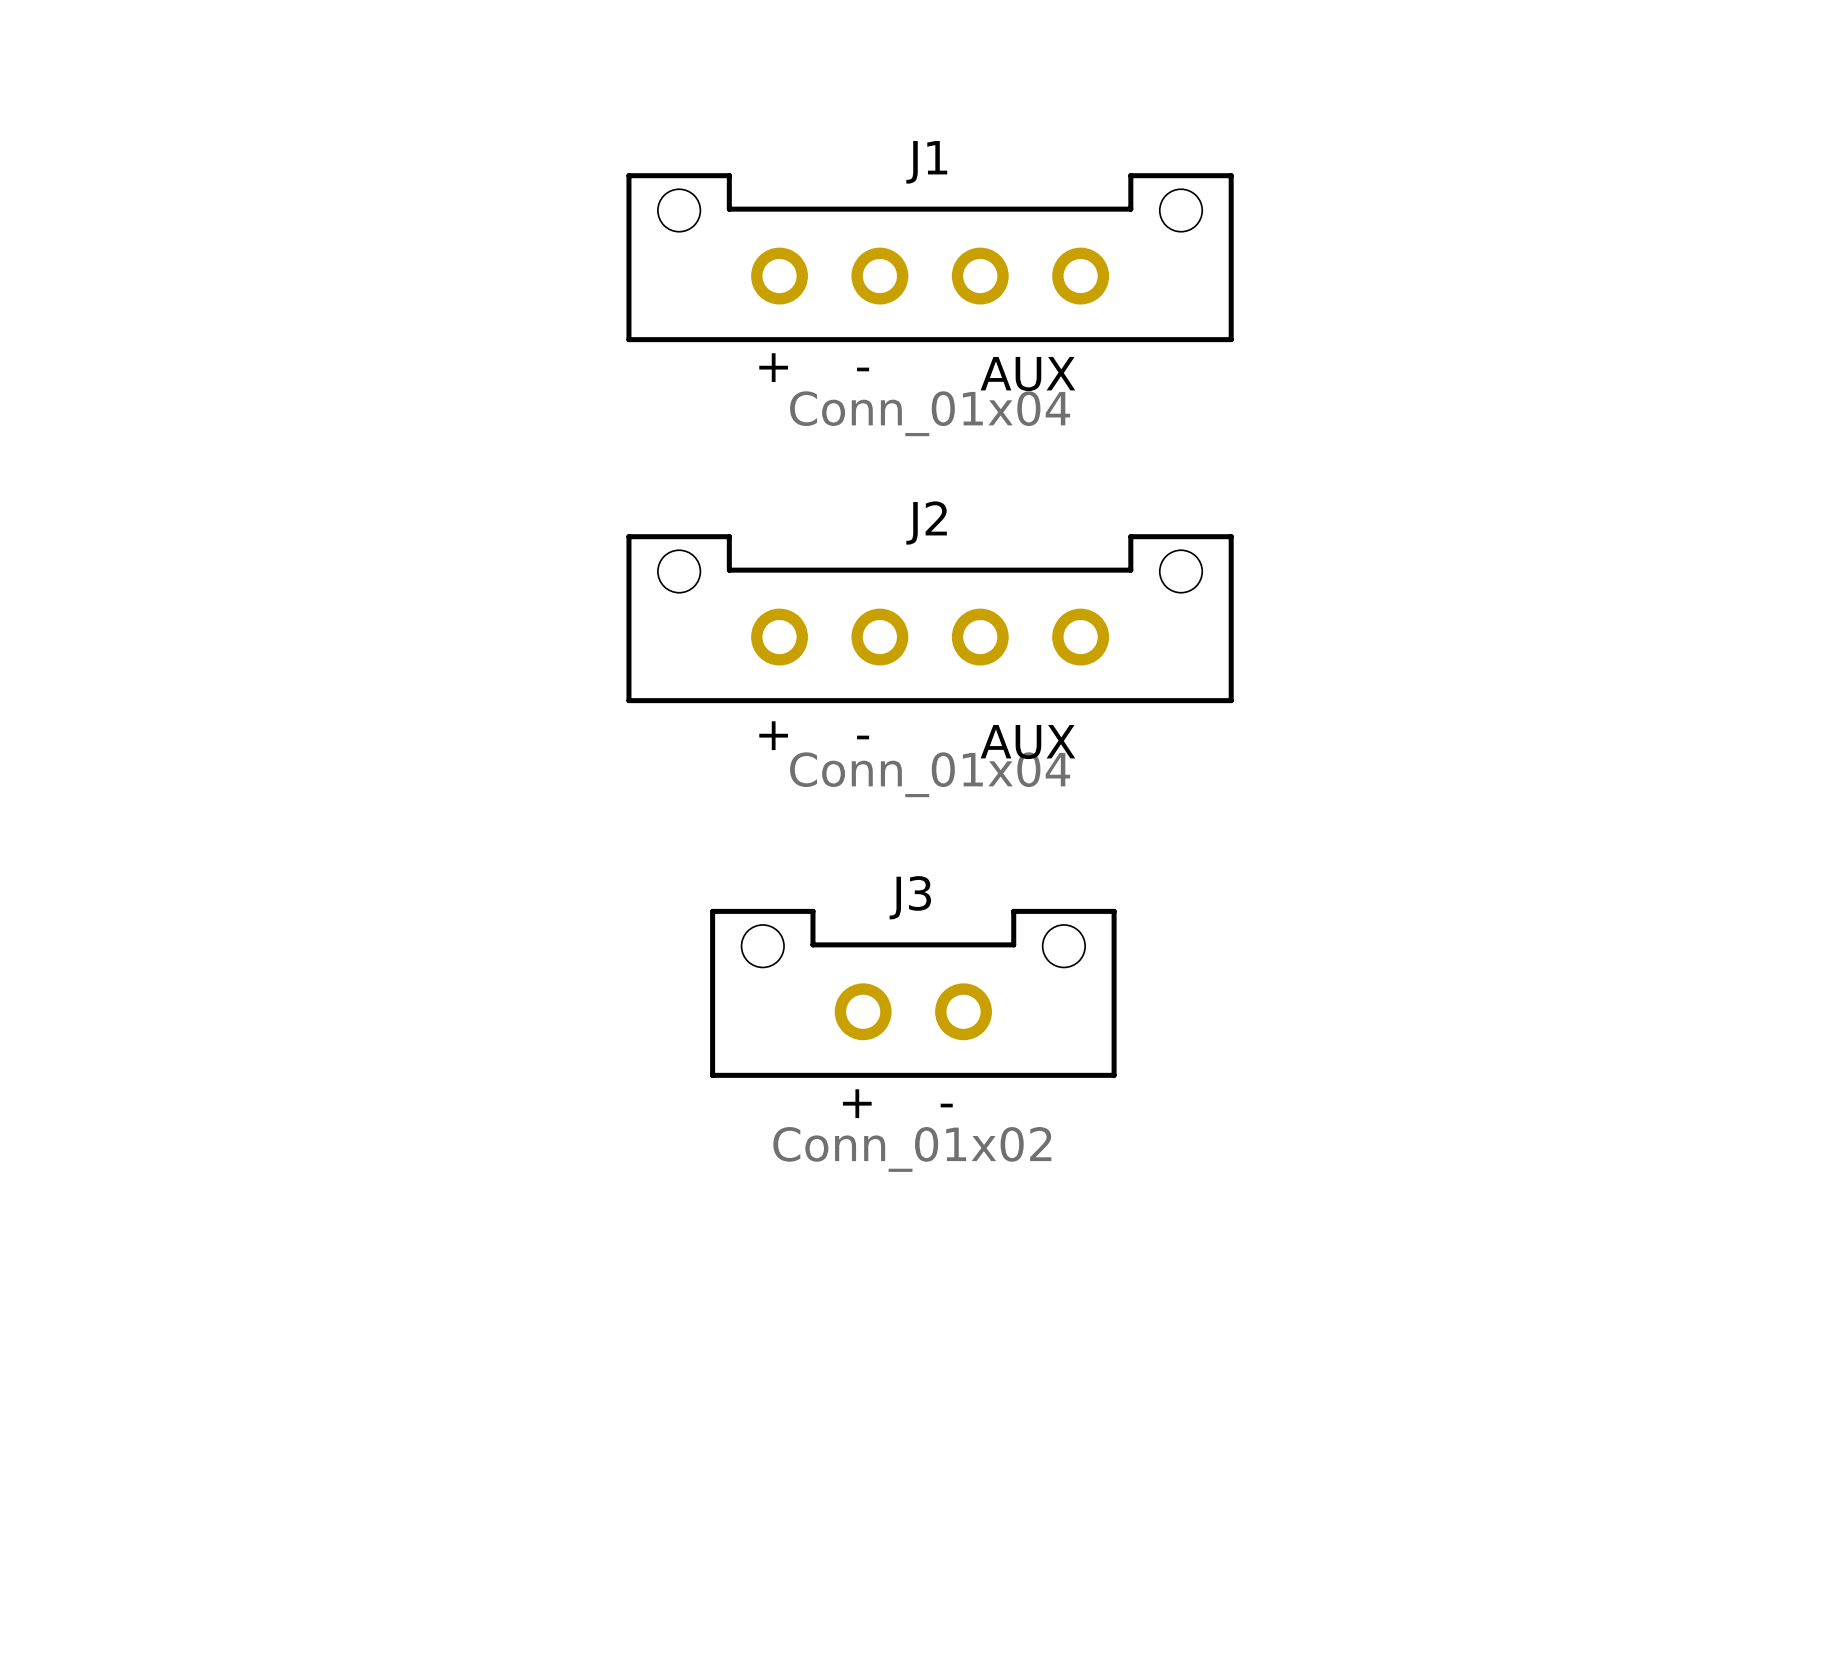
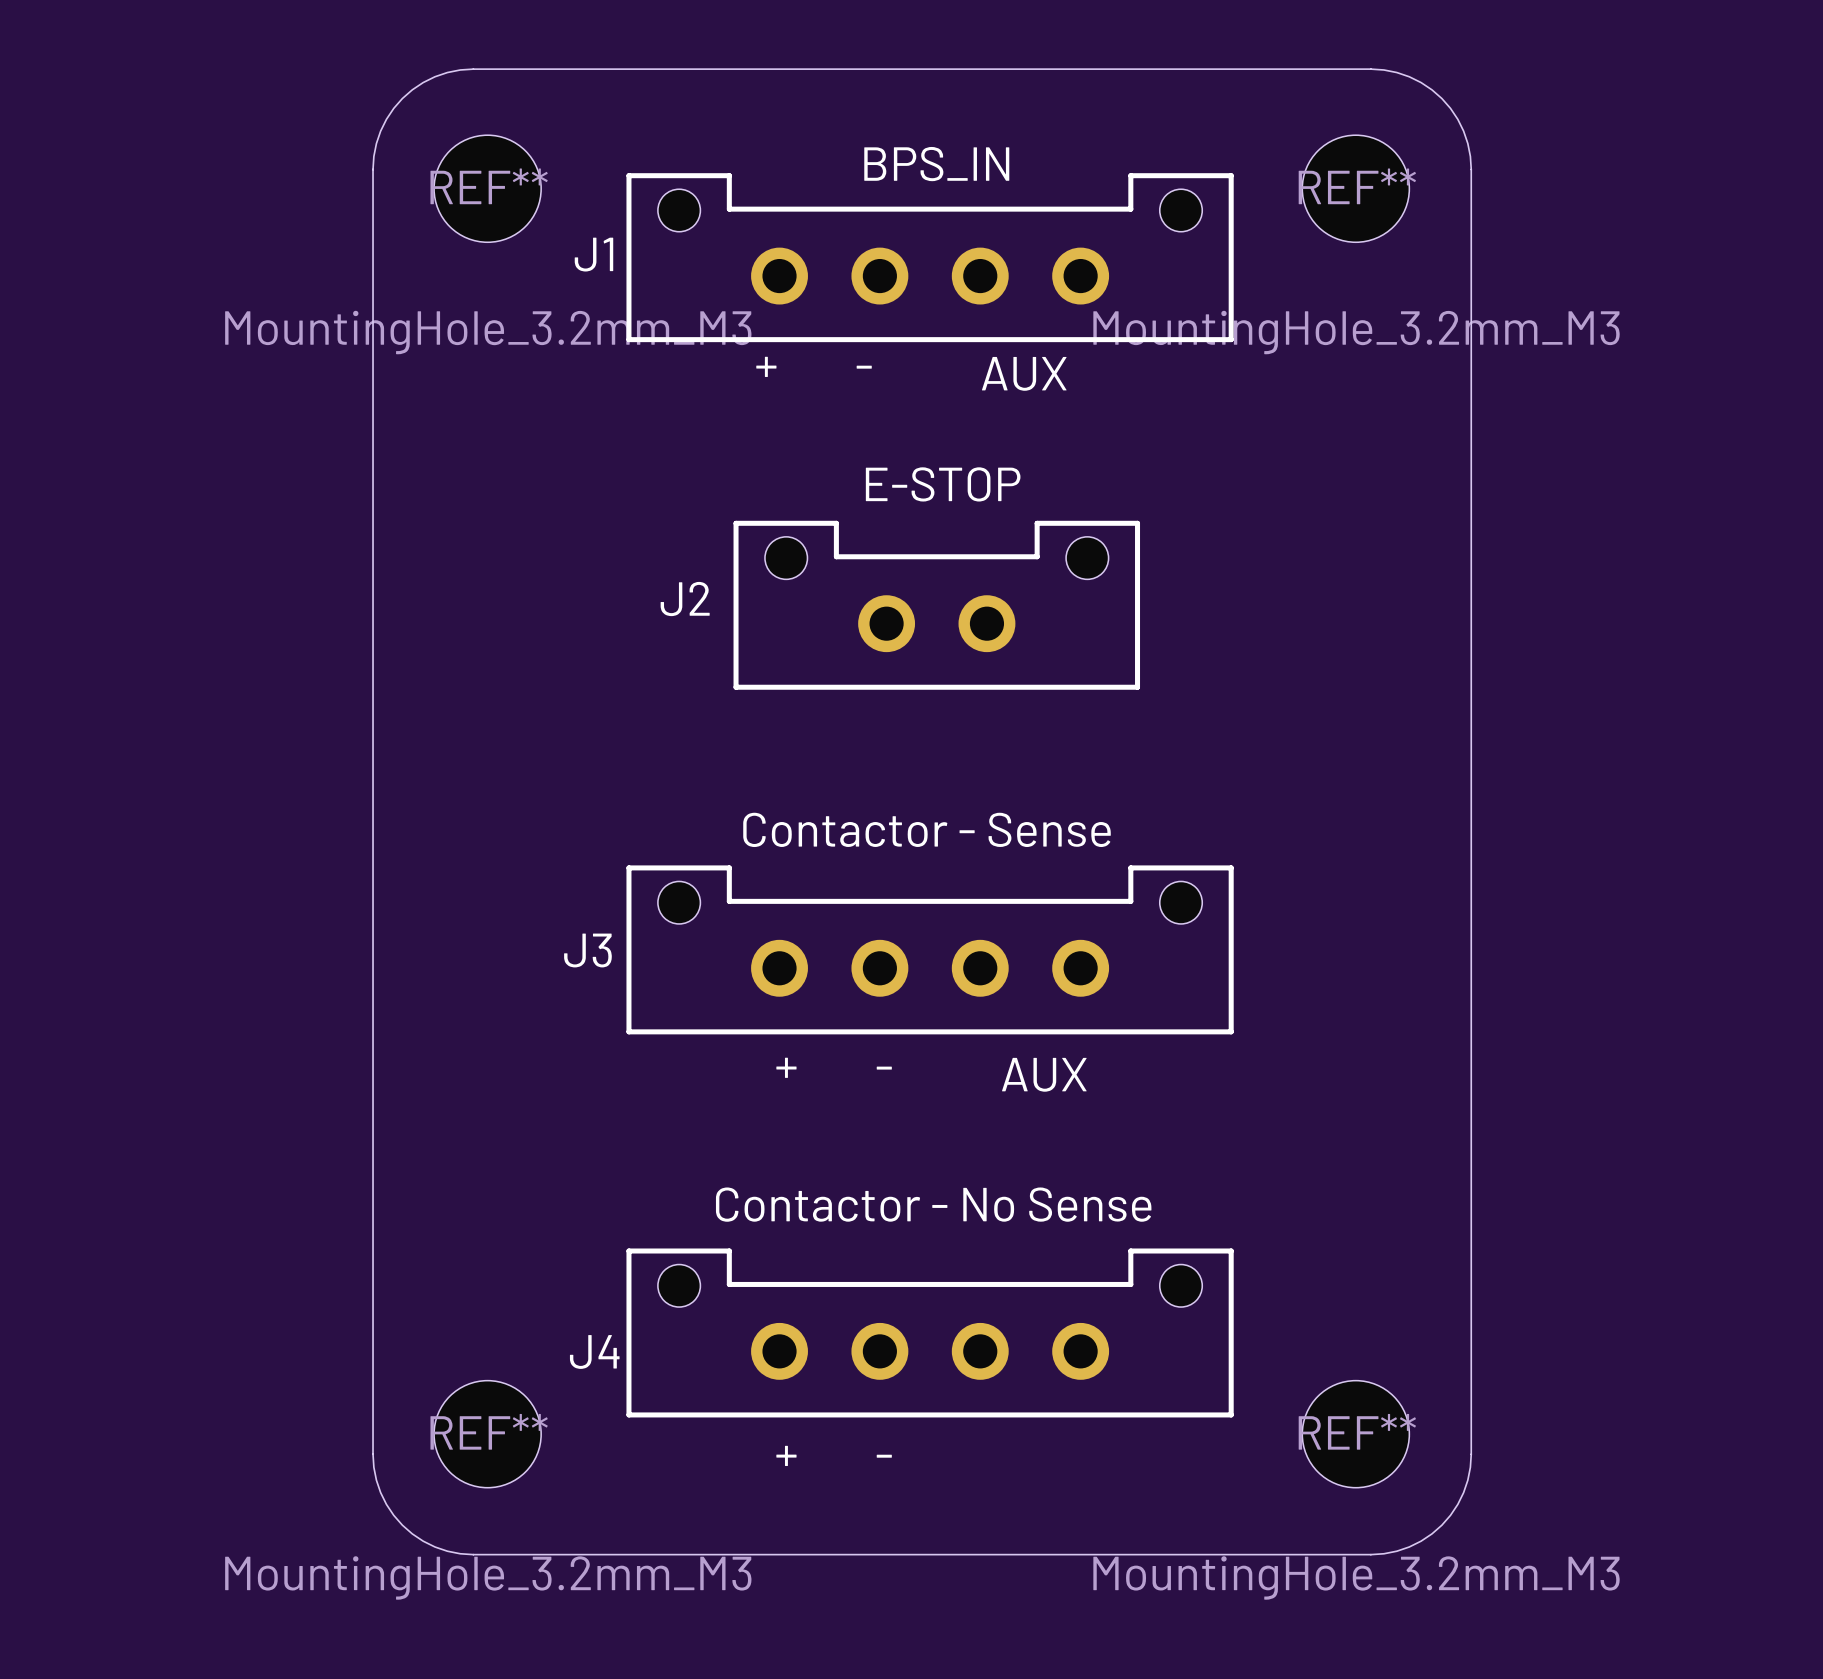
board edge: none -> (473, 69) (1370, 69) (1396, 72) (1421, 82) (1441, 98) (1457, 119) (1467, 143) (1471, 169) (1471, 1454) (1467, 1480) (1457, 1504) (1441, 1525) (1421, 1541) (1396, 1551) (1370, 1554) (473, 1554) (447, 1551) (423, 1541) (402, 1525) (386, 1504) (376, 1480) (373, 1454) (373, 169) (373, 156) (380, 131) (393, 108) (402, 98) (412, 89) (434, 76) (447, 72) (473, 69)
J1 name position: J1 (926, 162) -> J1 (593, 254)
REF**: none -> MountingHole_3.2mm_M3 (487, 188)
REF**: none -> MountingHole_3.2mm_M3 (1355, 188)
J1 value: Conn_01x04 (930, 413) -> BPS_IN (936, 164)
J2 name position: J2 (926, 523) -> J2 (685, 599)
J2 footprint: [626, 534, 1234, 704] -> [733, 520, 1141, 690]
text: + (773, 735) -> none
text: - (863, 737) -> none
text position: AUX (1027, 742) -> AUX (1044, 1074)
J2 value: Conn_01x04 (930, 774) -> E-STOP (943, 484)
J3 name position: J3 (910, 897) -> J3 (587, 950)
J3 footprint: [710, 908, 1117, 1078] -> [626, 865, 1234, 1035]
text position: + (857, 1103) -> + (786, 1067)
text position: - (946, 1105) -> - (884, 1068)
J3 value: Conn_01x02 (912, 1149) -> Contactor - Sense (927, 829)
J4: none -> Contactor - No Sense (930, 1332)
REF**: none -> MountingHole_3.2mm_M3 (487, 1434)
REF**: none -> MountingHole_3.2mm_M3 (1355, 1434)
text: none -> + (786, 1455)
text: none -> - (884, 1456)

